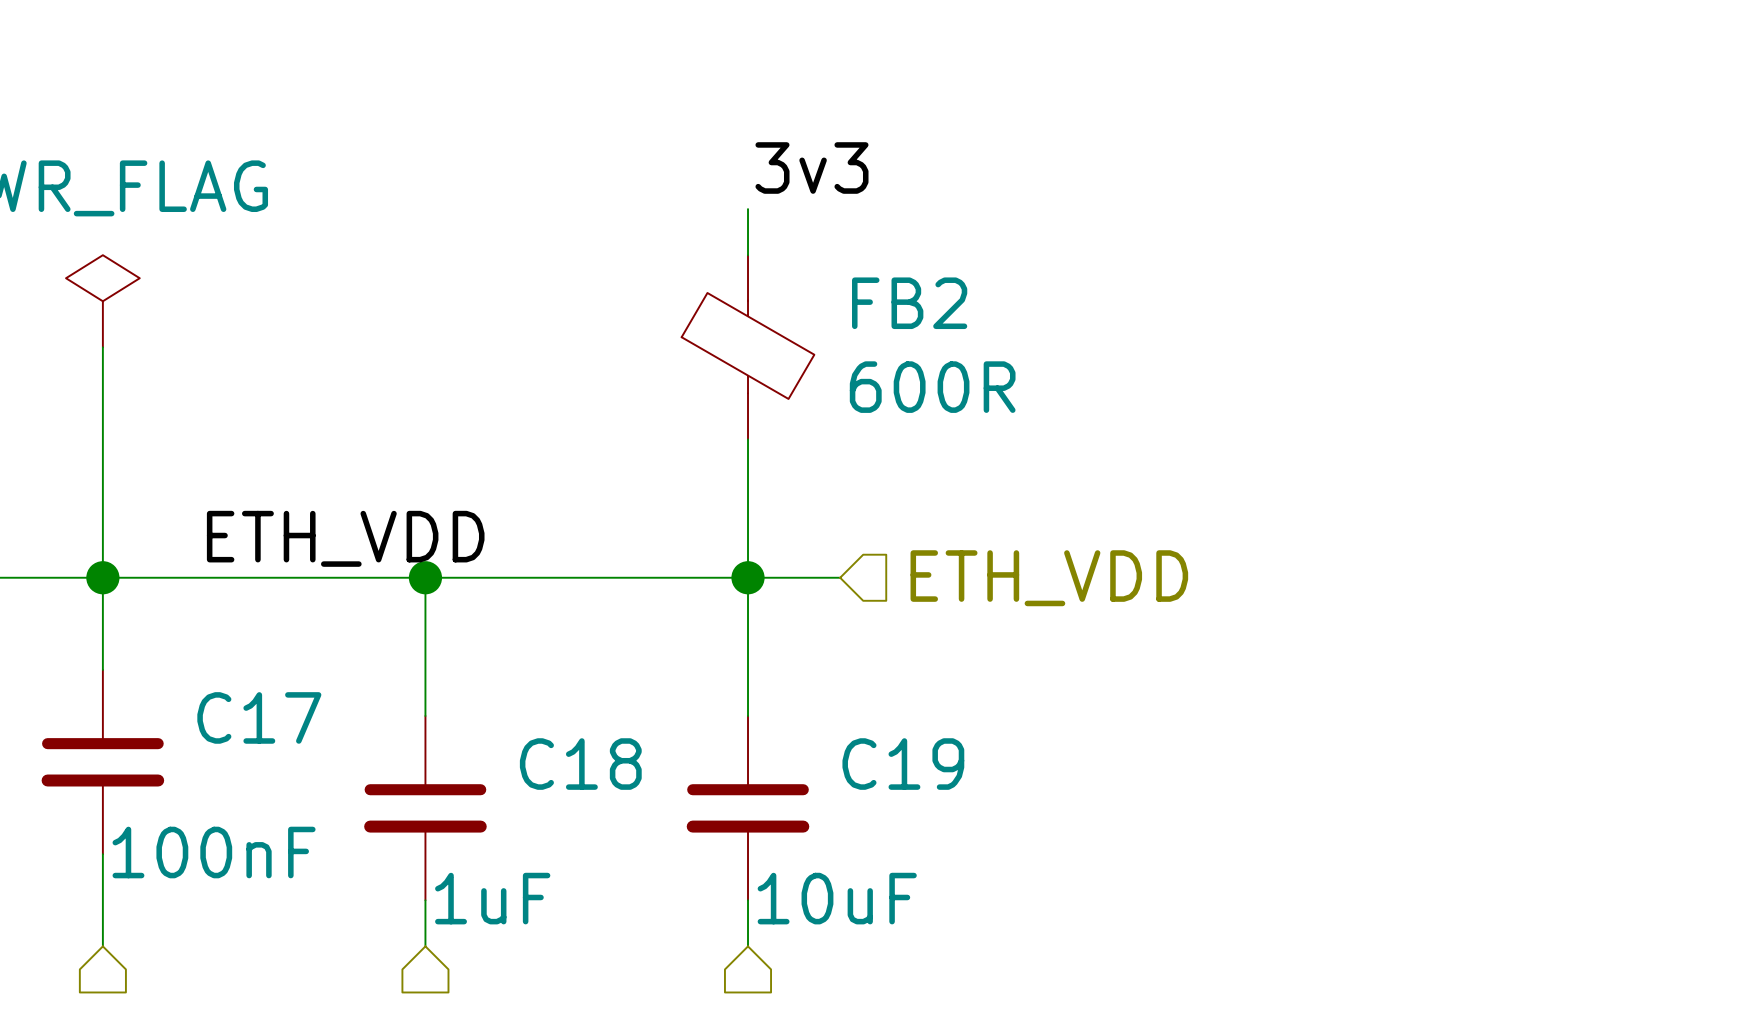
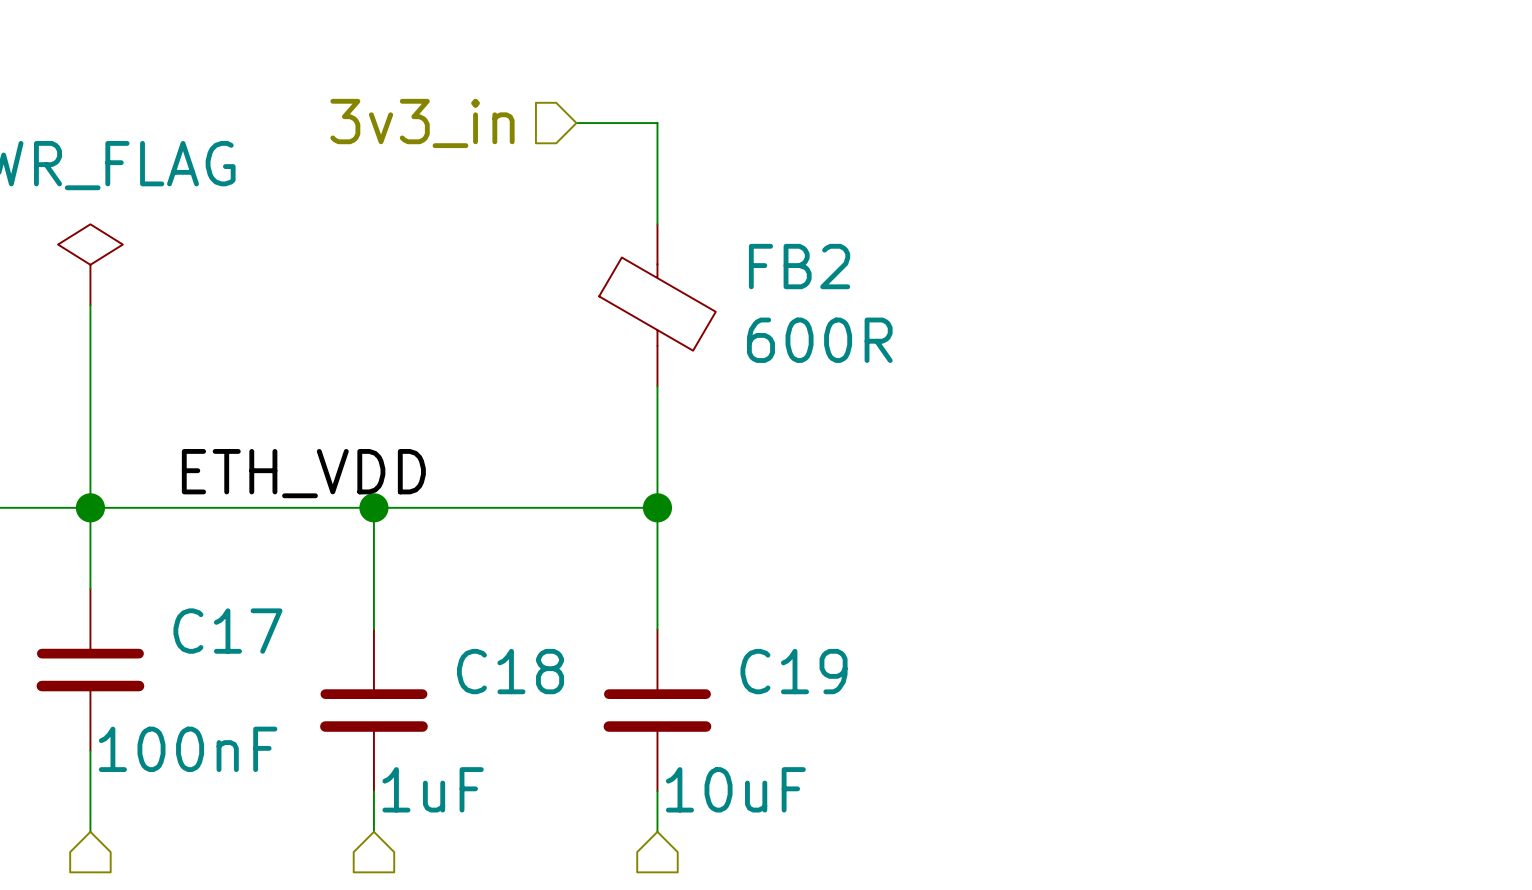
hierarchical label: none -> 3v3_in (422, 123)
wire: none -> (576, 123) (657, 123) (657, 183)
label: 3v3 (811, 167) -> none
wire: (748, 577) (840, 577) -> none
hierarchical label: ETH_VDD (1049, 578) -> none

